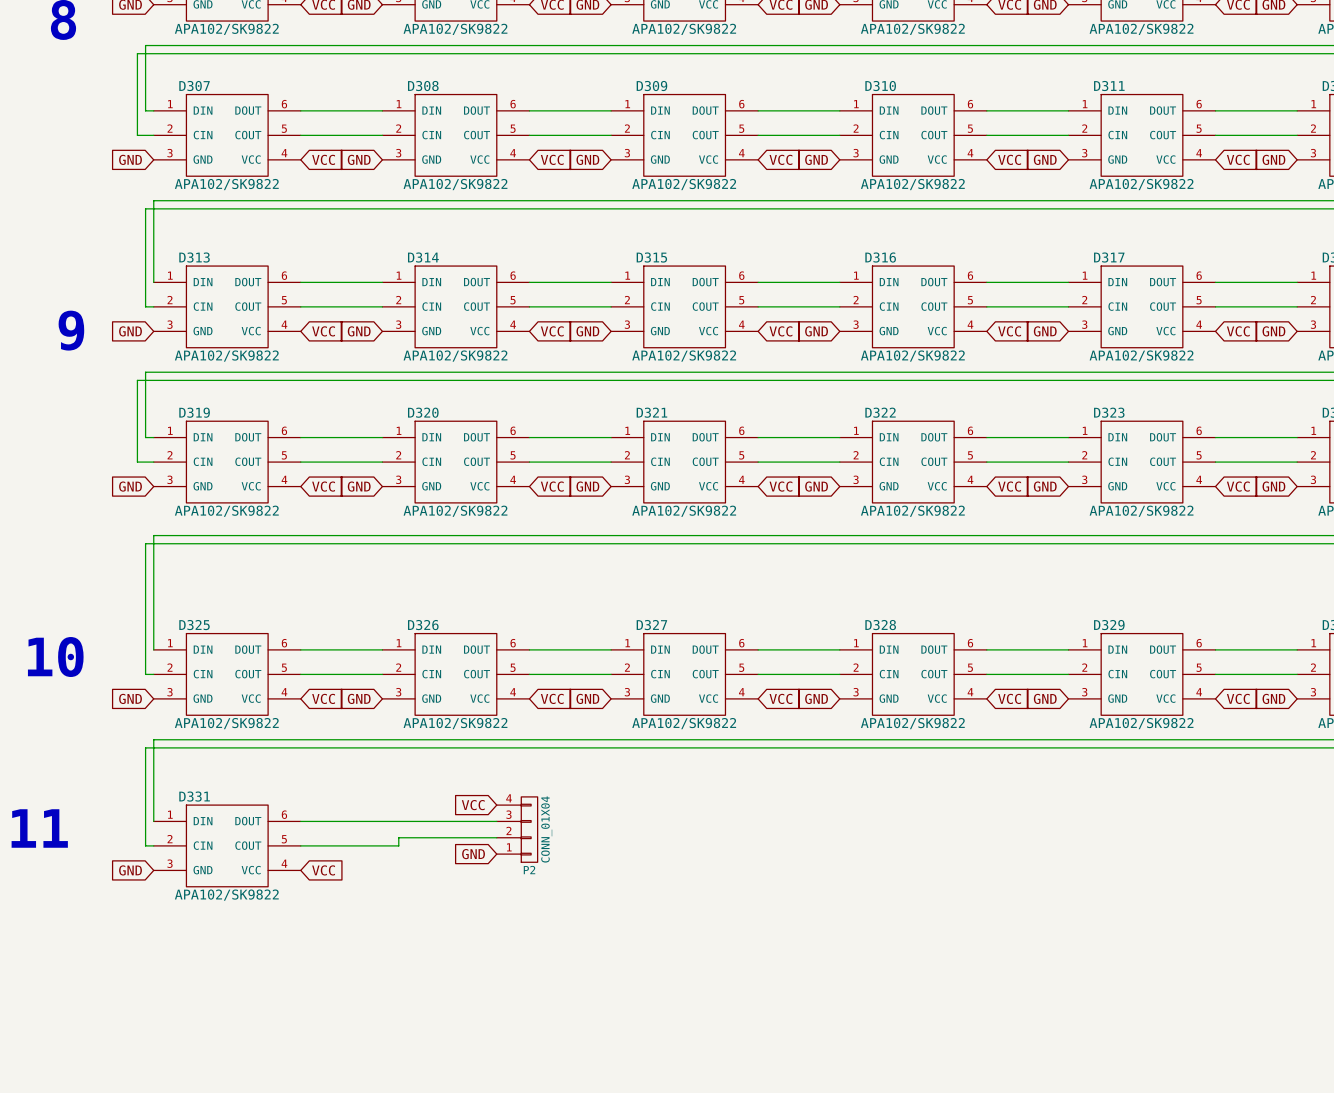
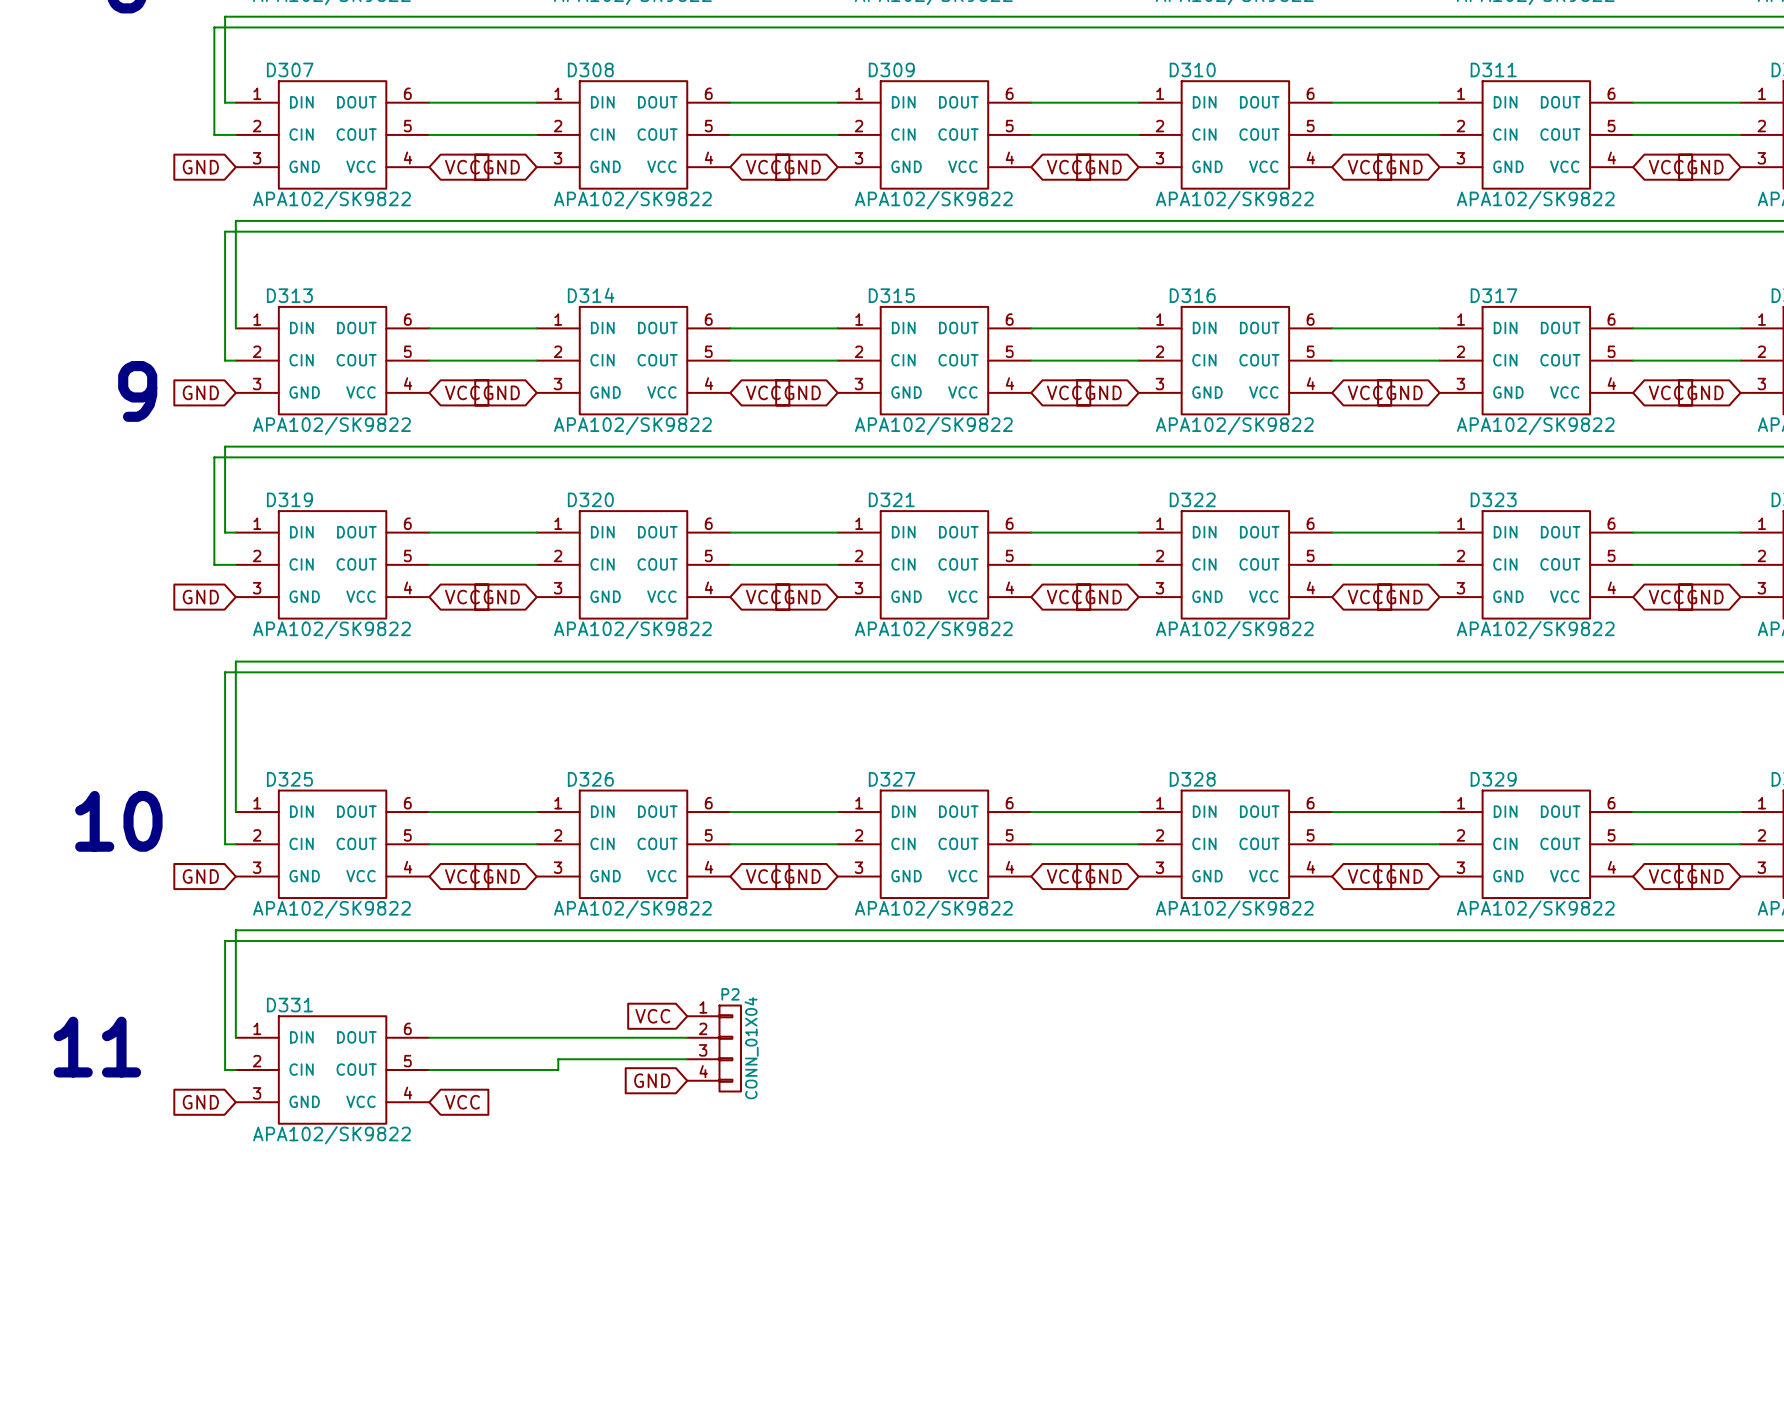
P2 flip: as is (529, 829) -> up-down (730, 1048)

